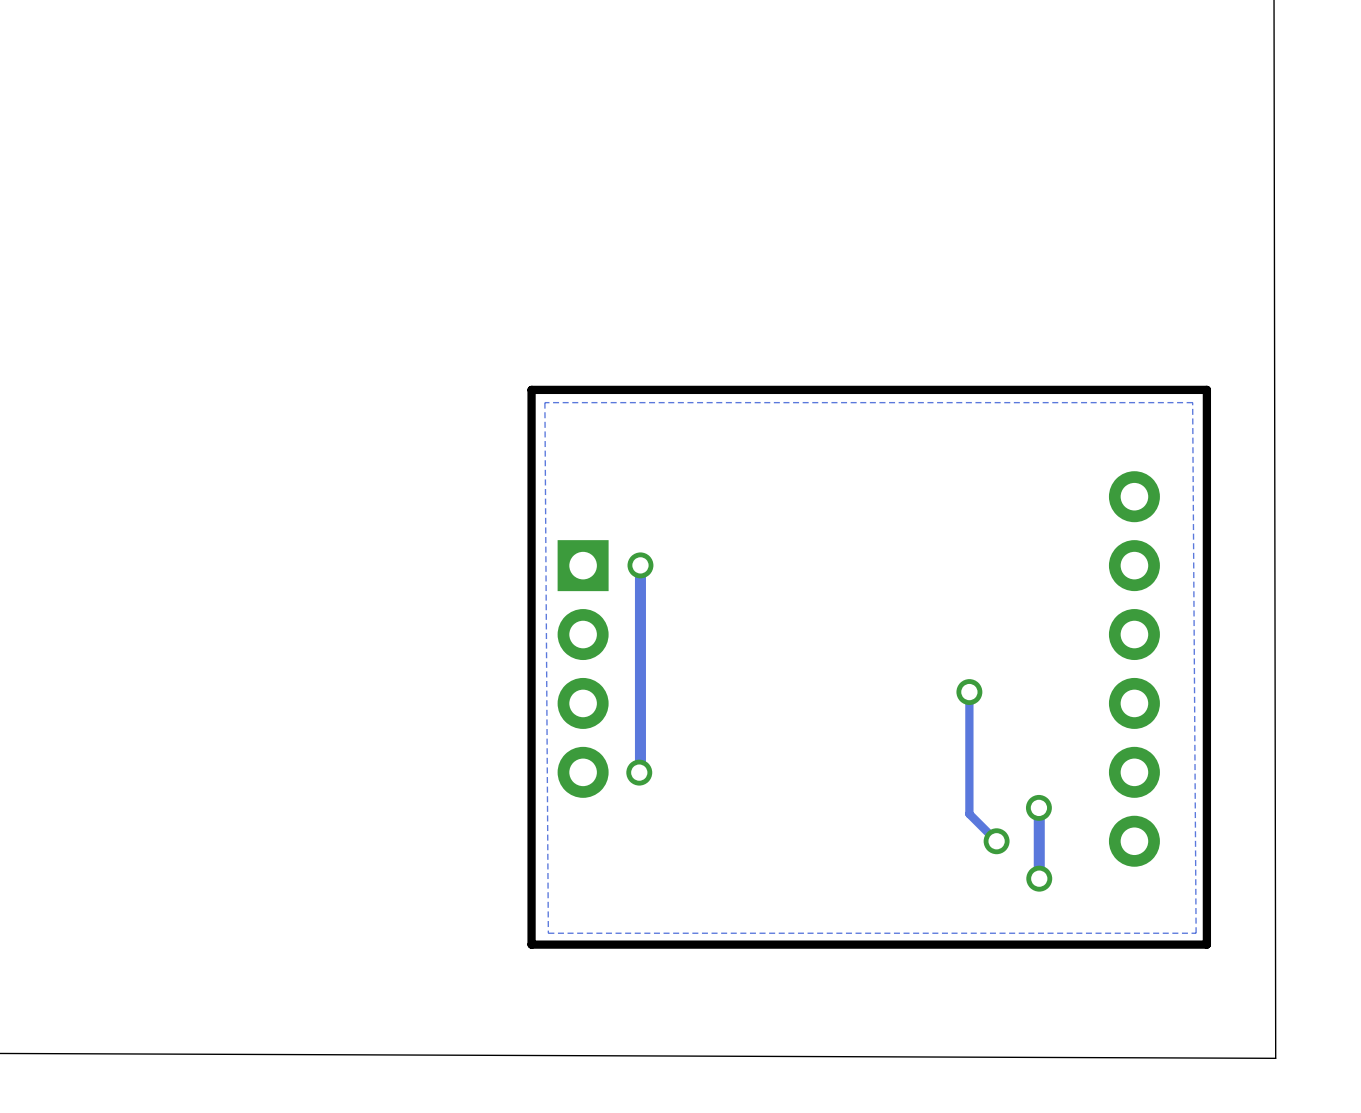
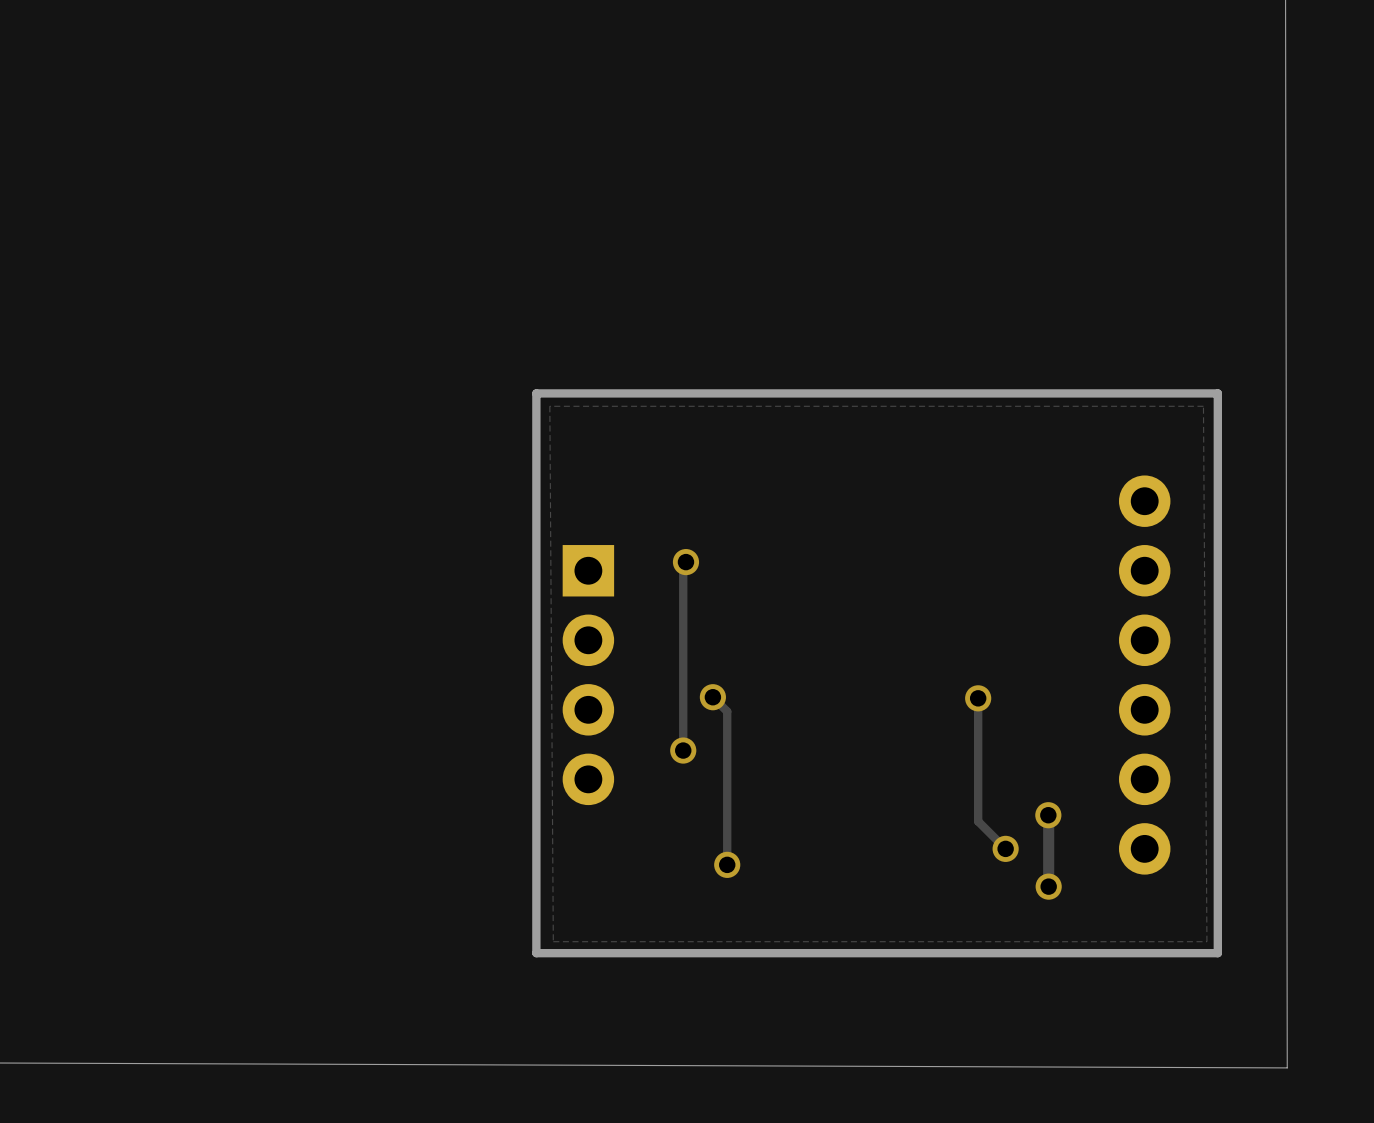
track: none -> (685, 562) (683, 564) (683, 750)
track: (640, 565) (639, 772) -> none
via position: (640, 565) -> (685, 562)
track: none -> (712, 697) (727, 711) (727, 864)
via: none -> (712, 697)
via position: (639, 772) -> (683, 750)
via: none -> (727, 864)

